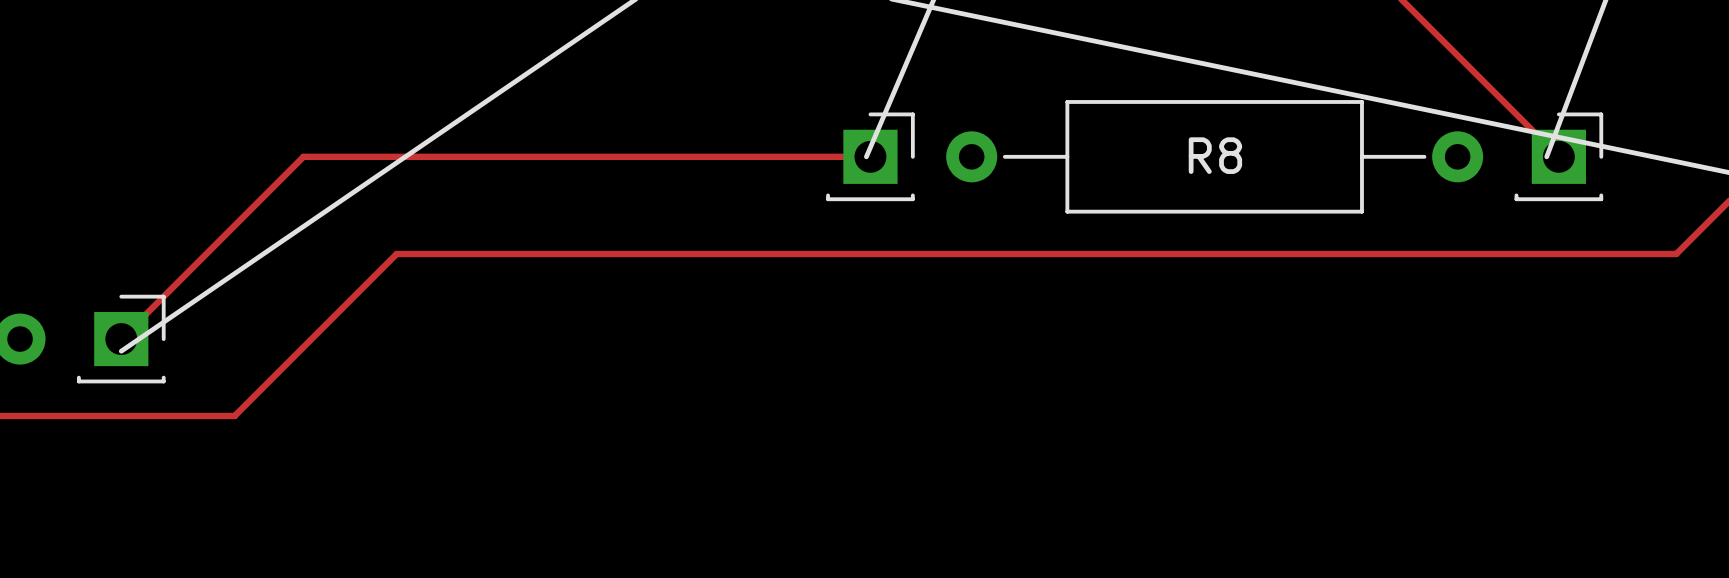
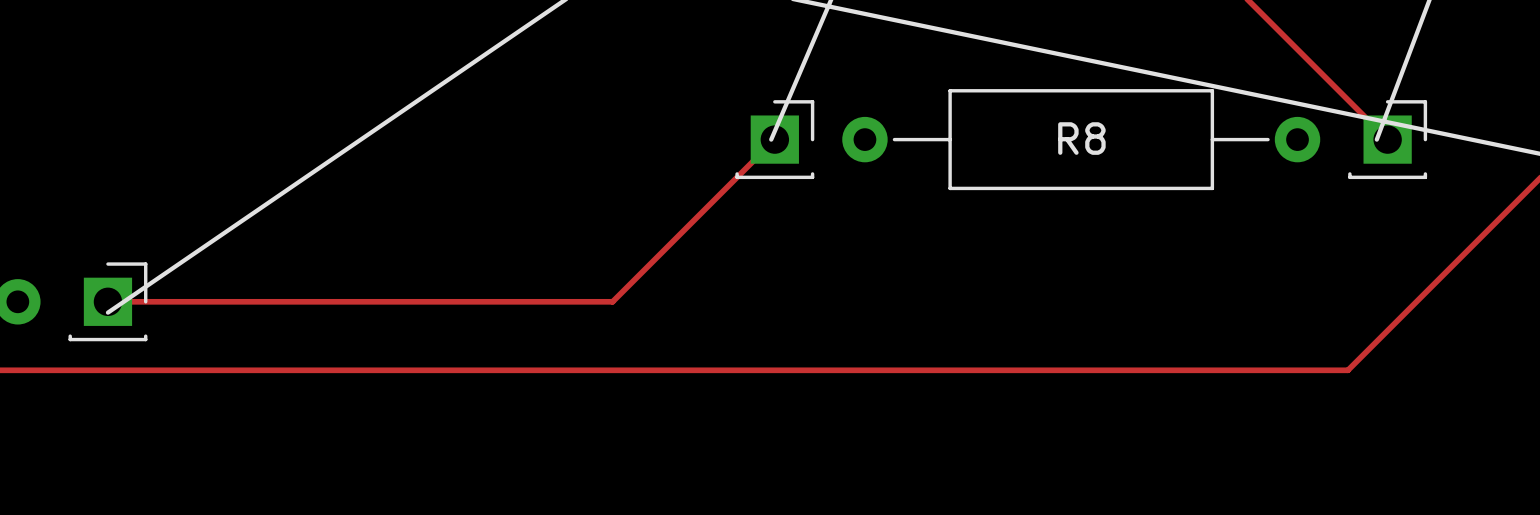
track: (870, 156) (303, 156) (121, 339) -> (774, 139) (612, 301) (107, 301)
track: (1676, 254) (396, 254) (234, 415) -> (1492, 226) (1347, 370) (208, 370)

